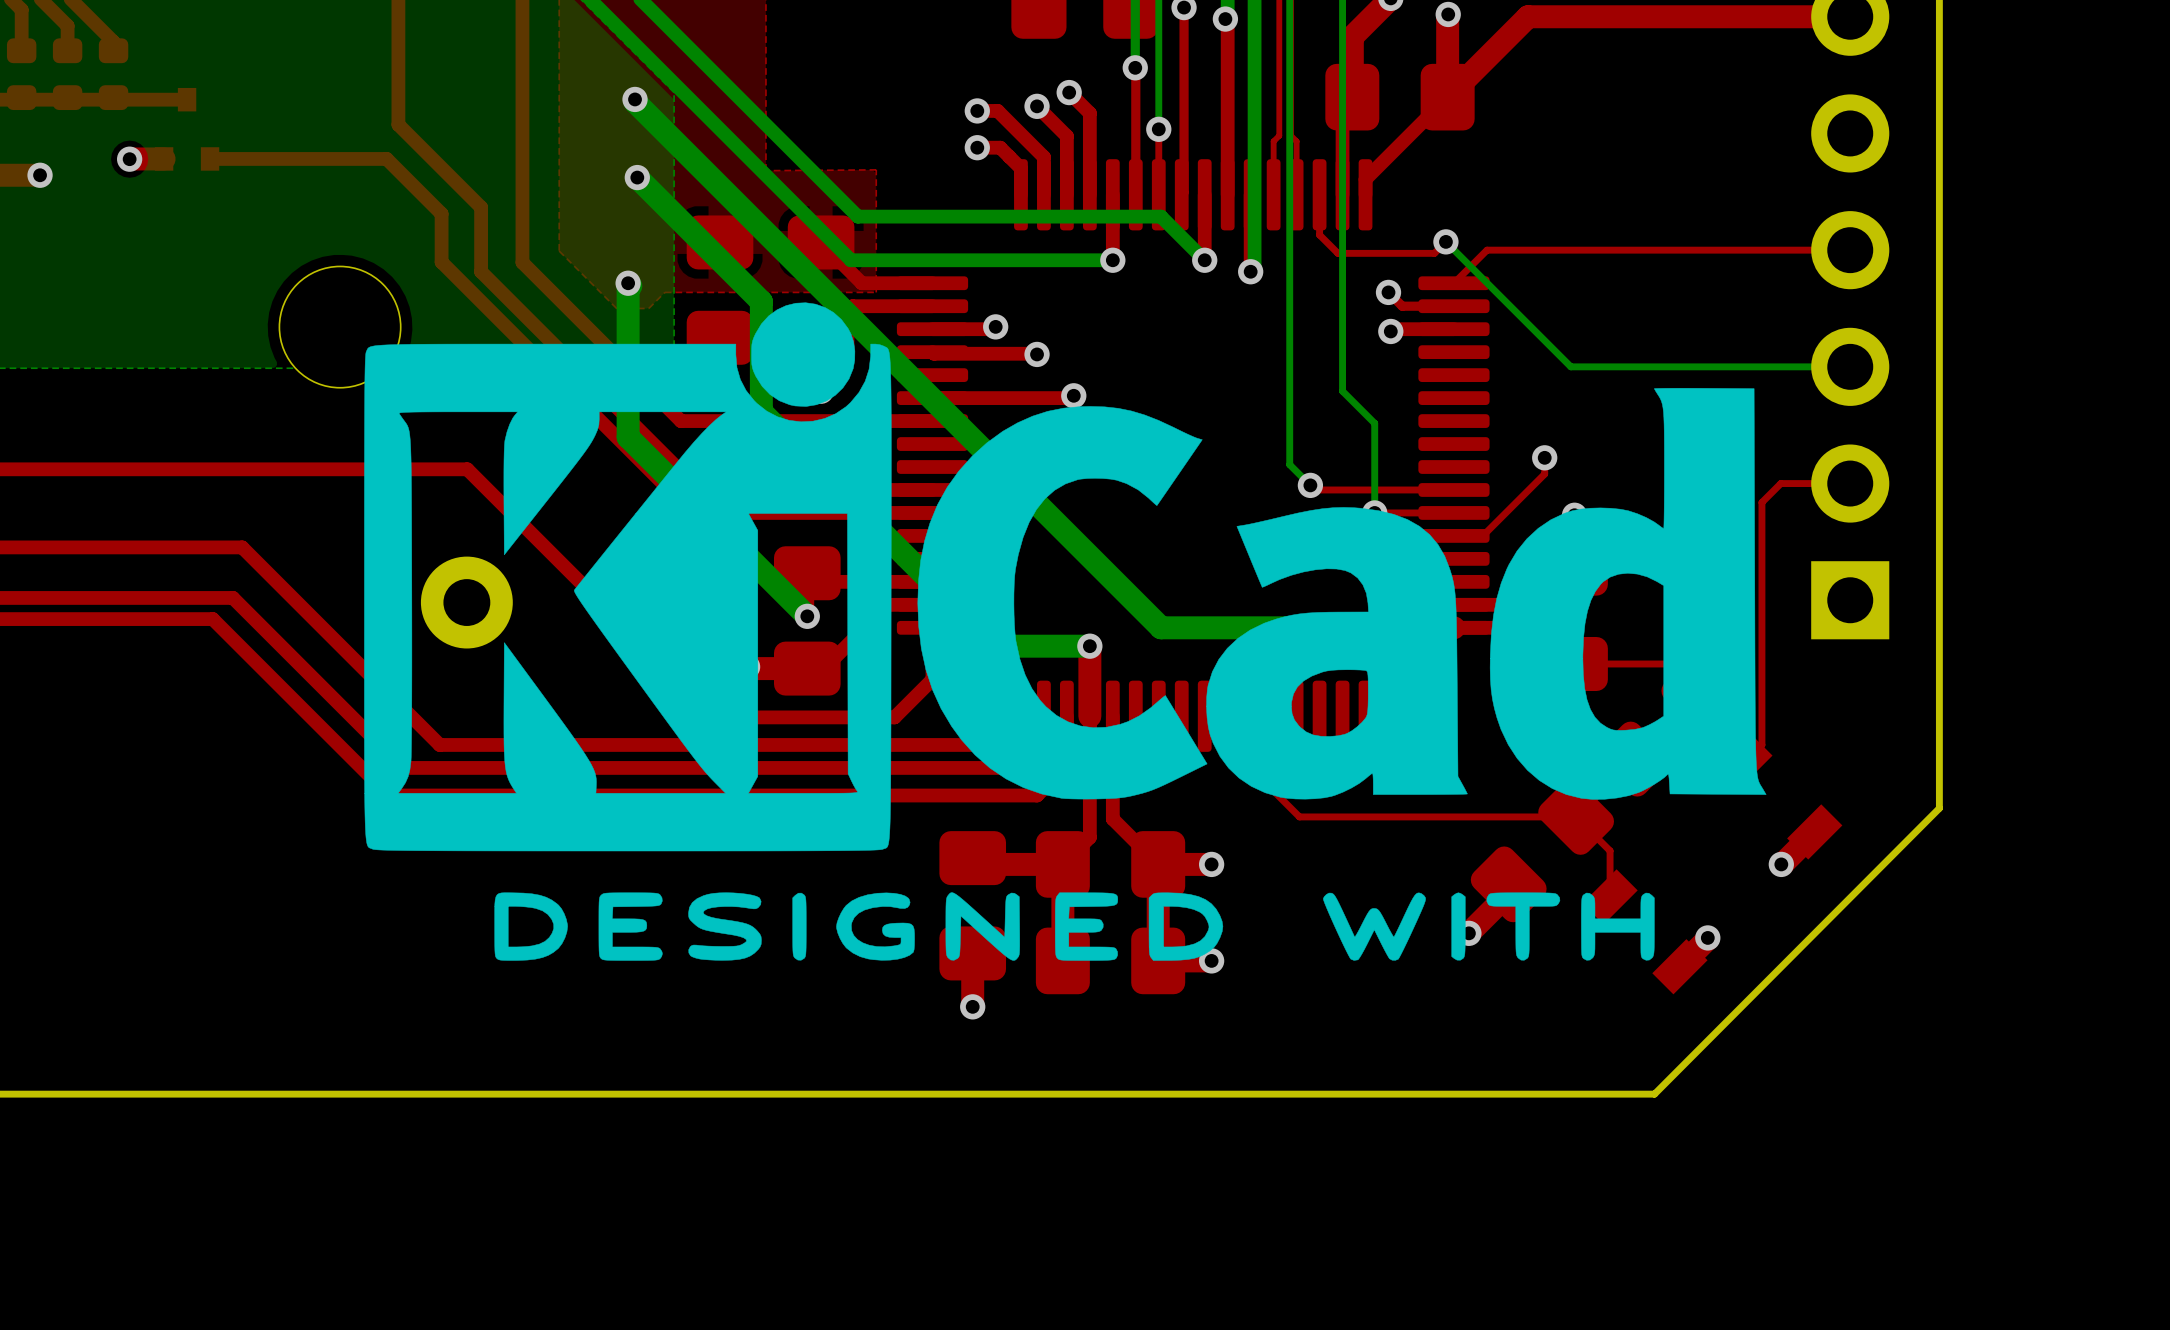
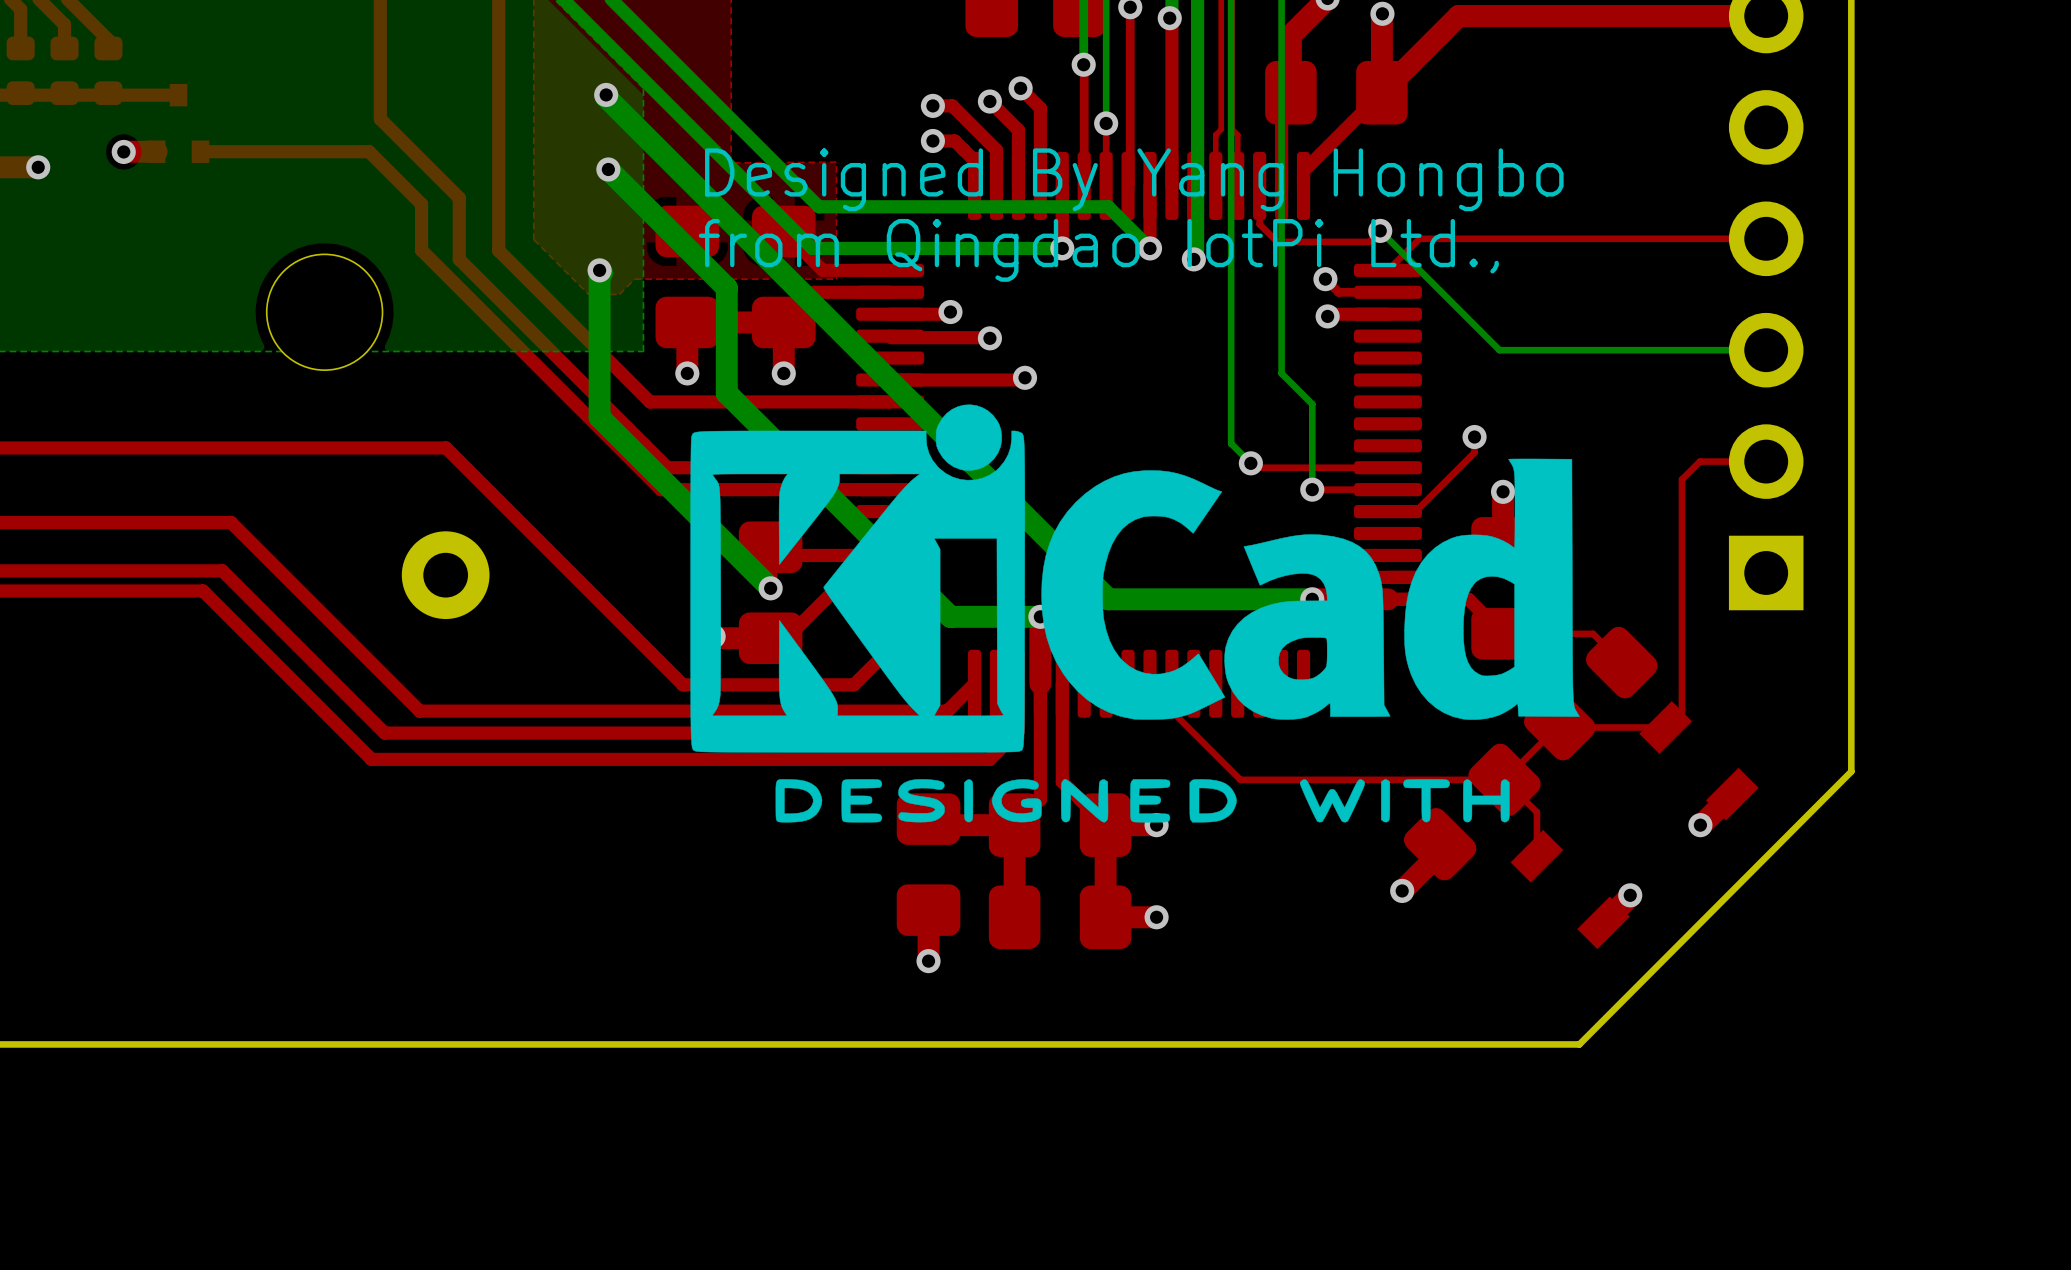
text: none -> Designed By Yang Hongbo (1134, 179)
text: none -> from Qingdao IotPi Ltd., (1098, 250)
drawing: [364, 302, 1767, 961] -> none
drawing: none -> [690, 404, 1580, 823]

